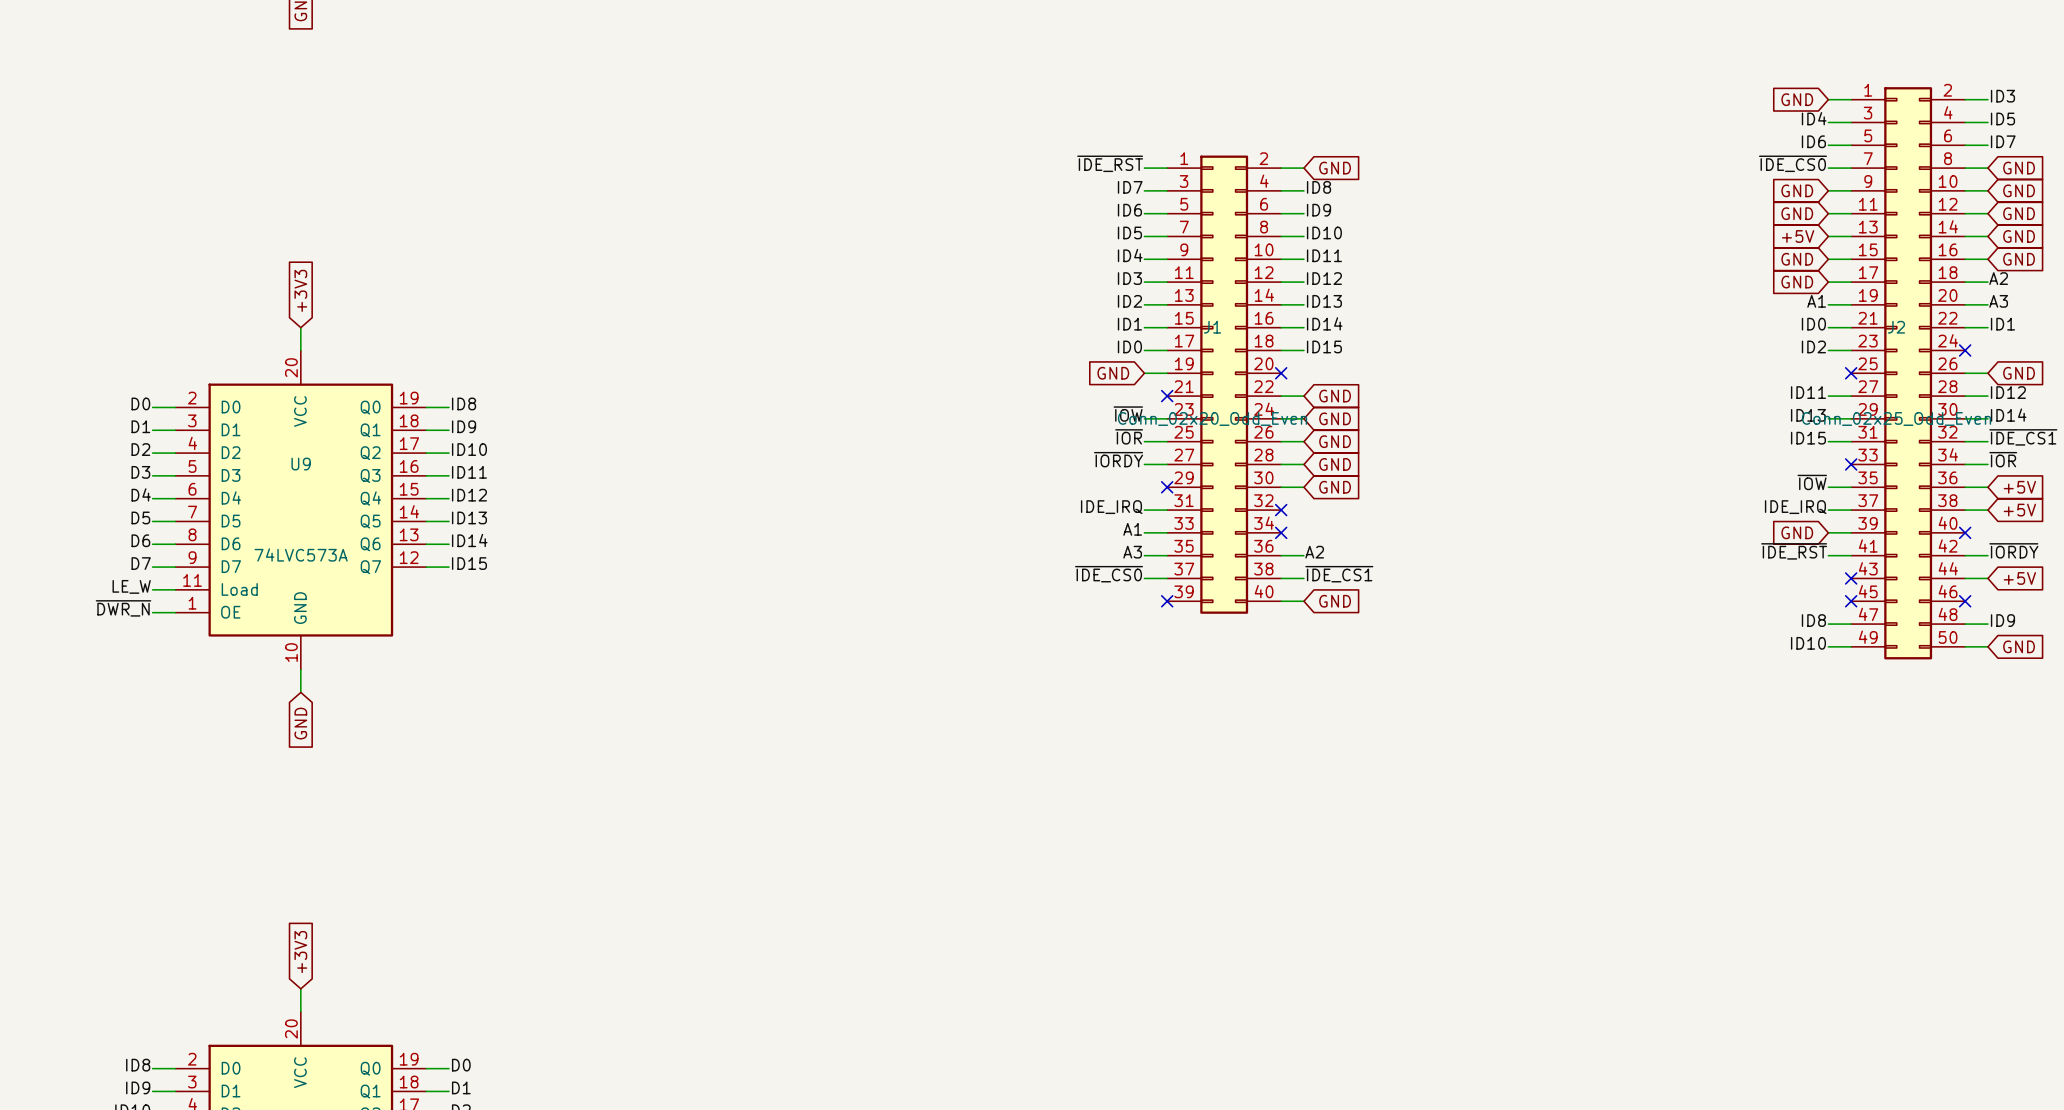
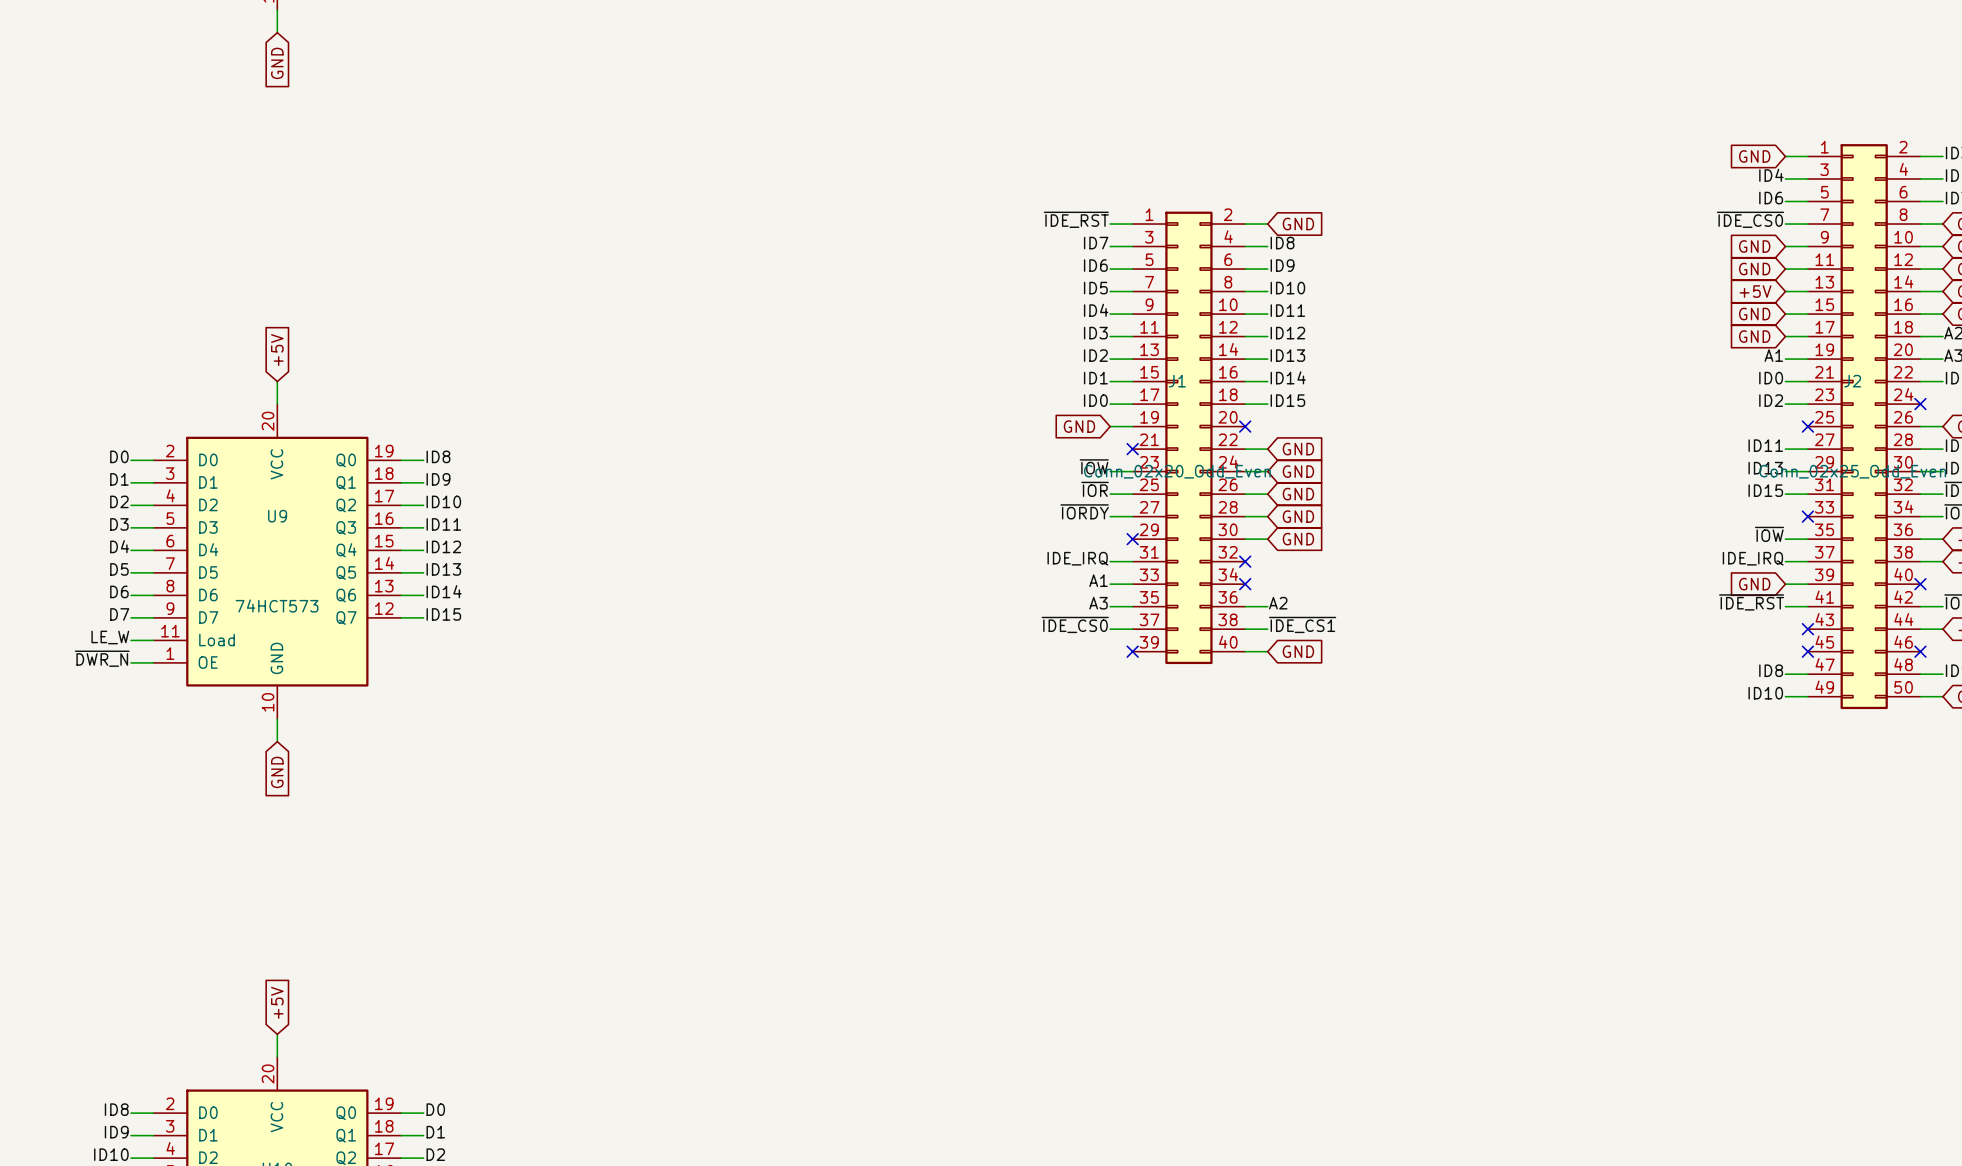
global label: +3V3 (300, 290) -> +5V (277, 350)
U9 value: 74LVC573A (301, 554) -> 74HCT573 (277, 605)
global label: +3V3 (300, 952) -> +5V (277, 1002)

